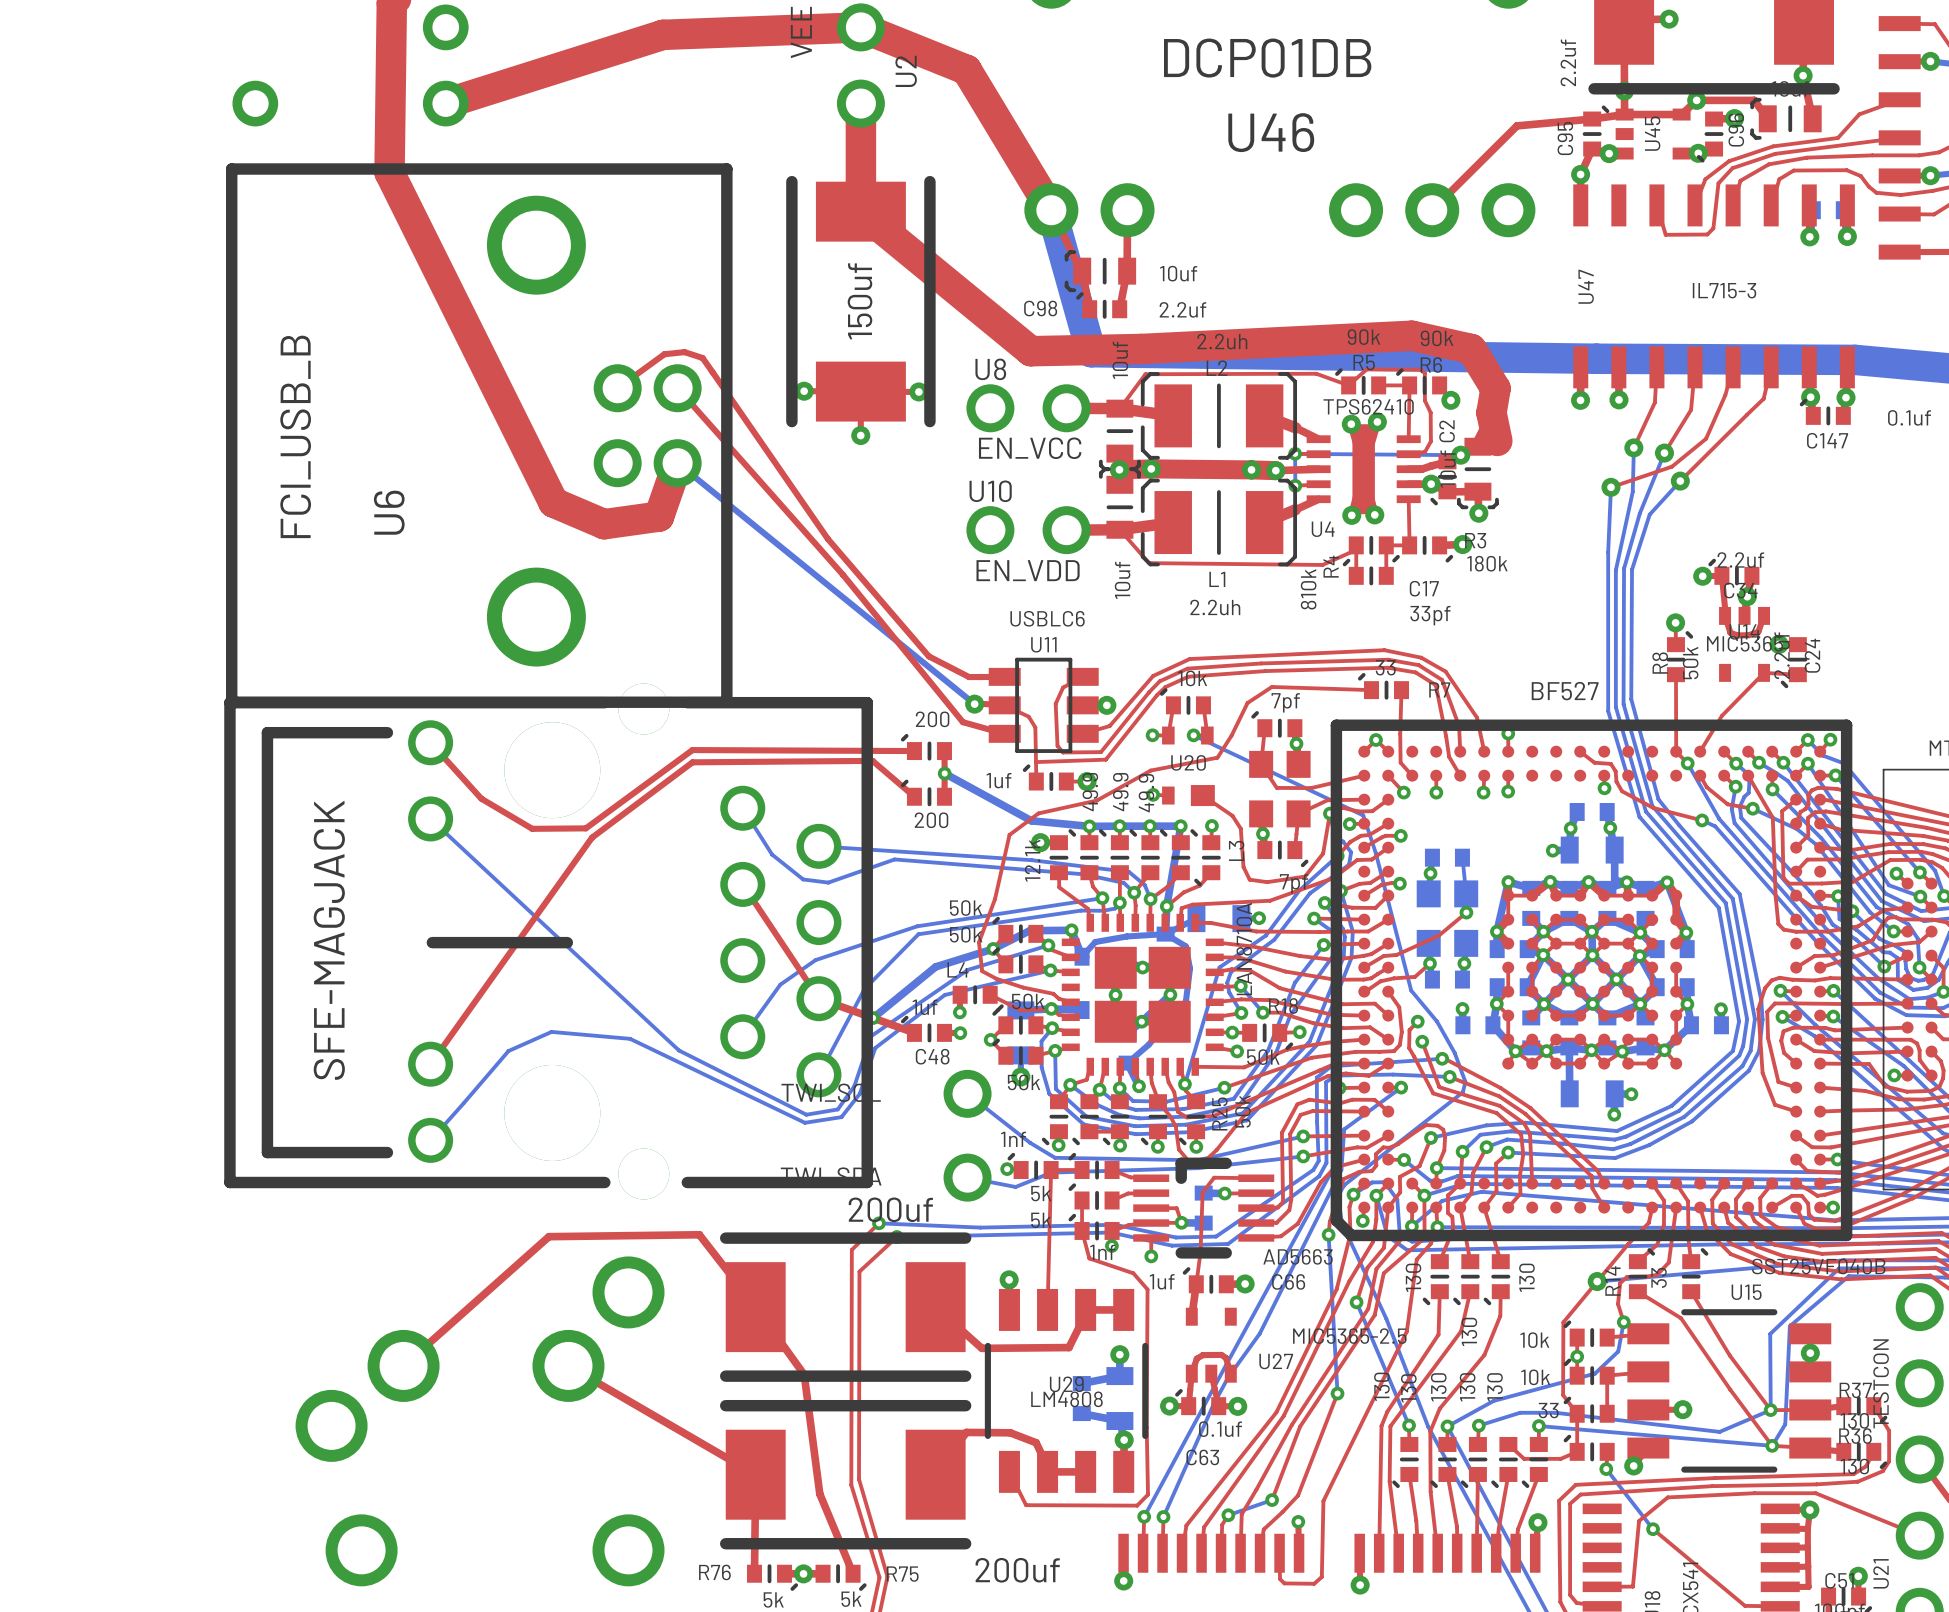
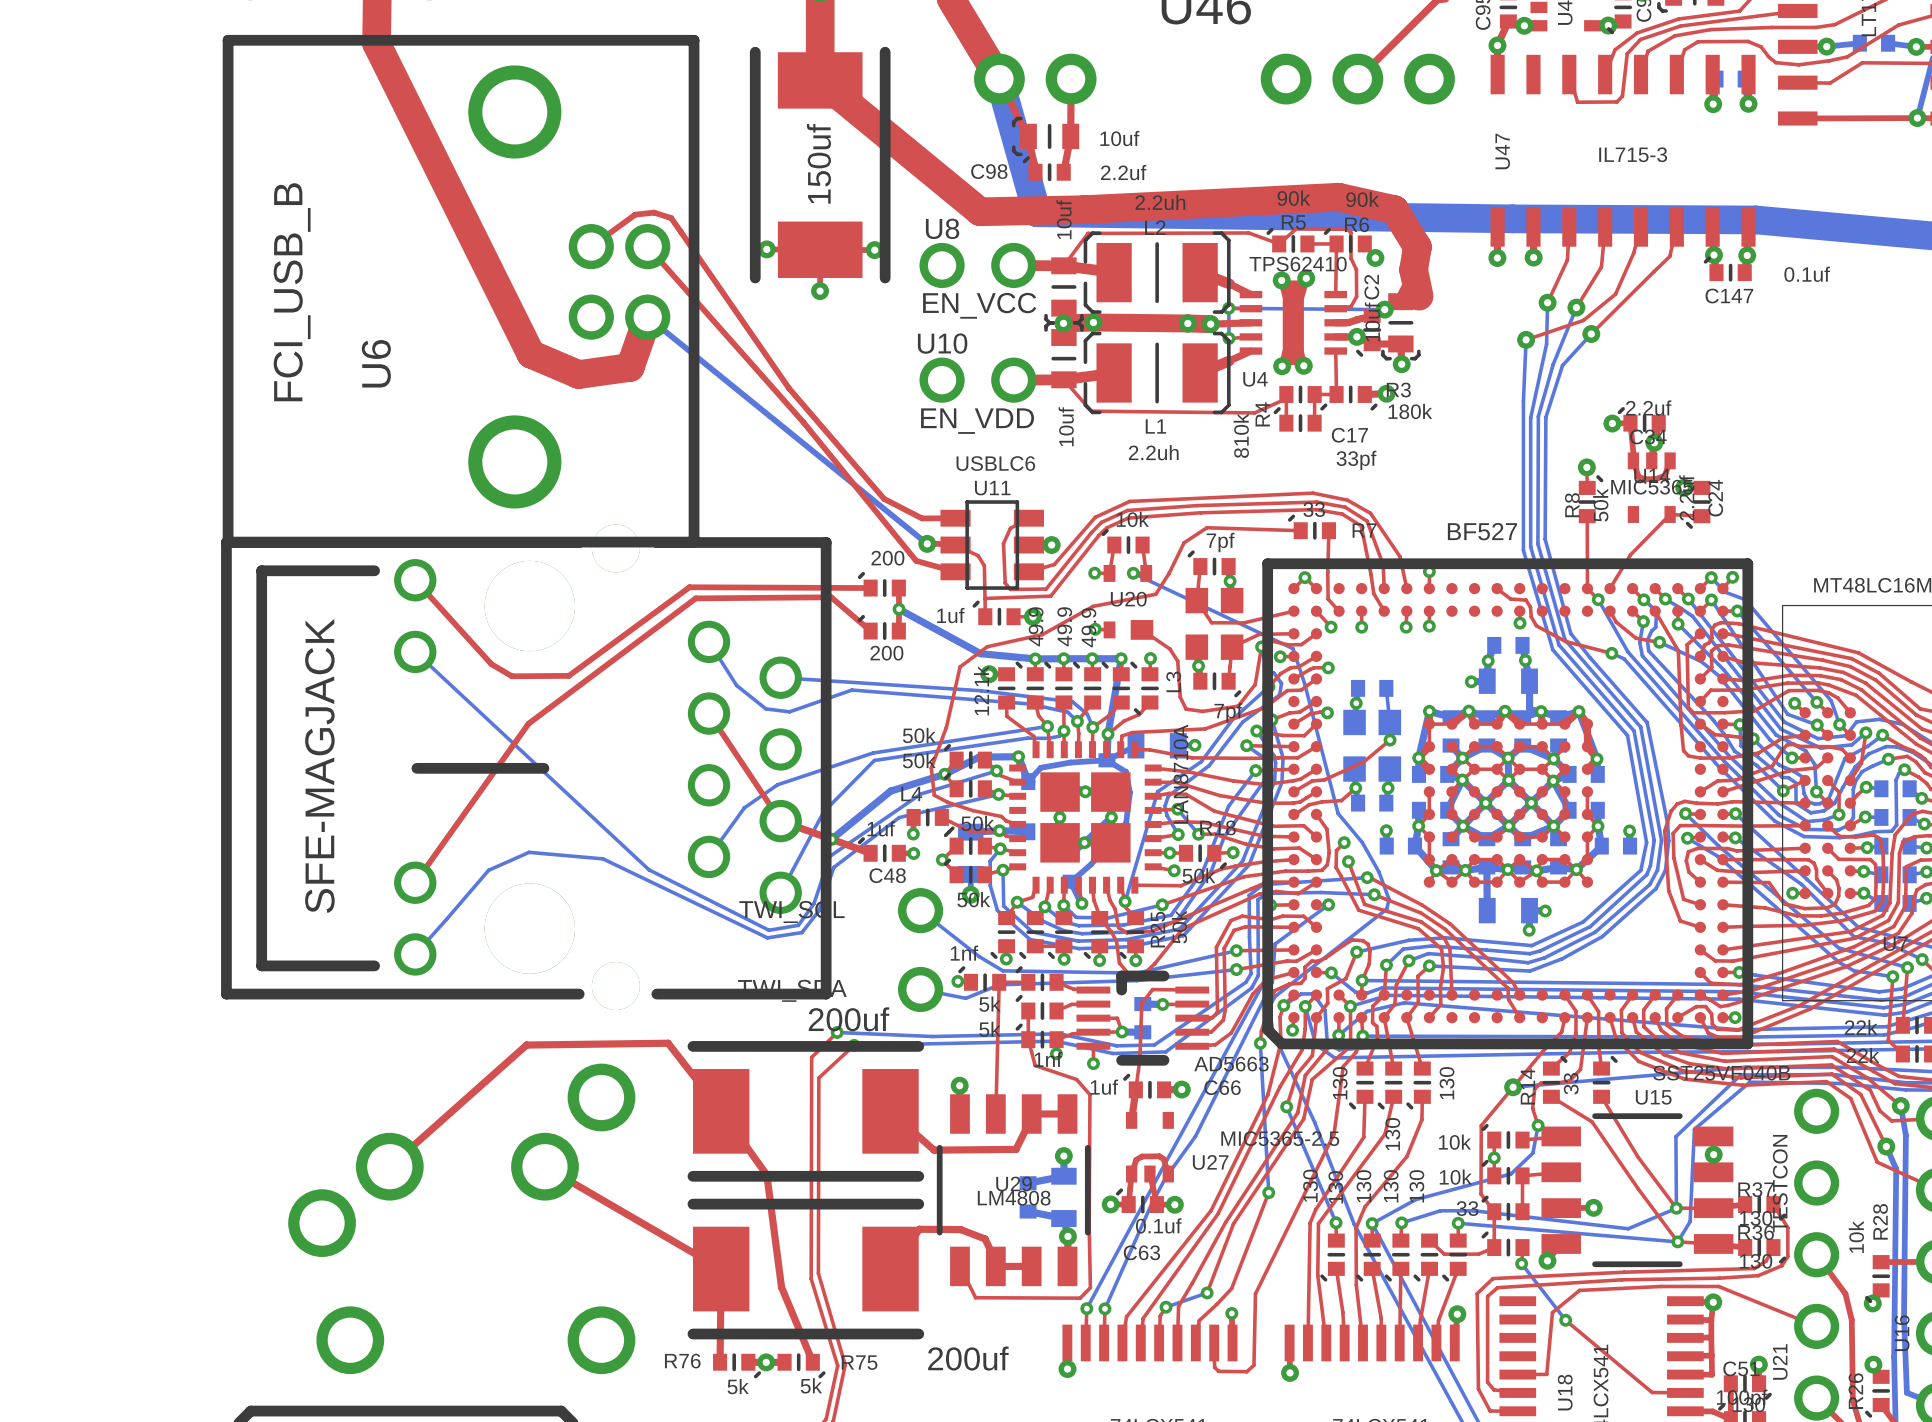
top track: (722, 750) (692, 750) (585, 828) (532, 828) (481, 798) -> (689, 587) (568, 675) (511, 676) (491, 664) (463, 632)
top track: (728, 762) (692, 762) (592, 837) (551, 895) -> (695, 598) (528, 723)

